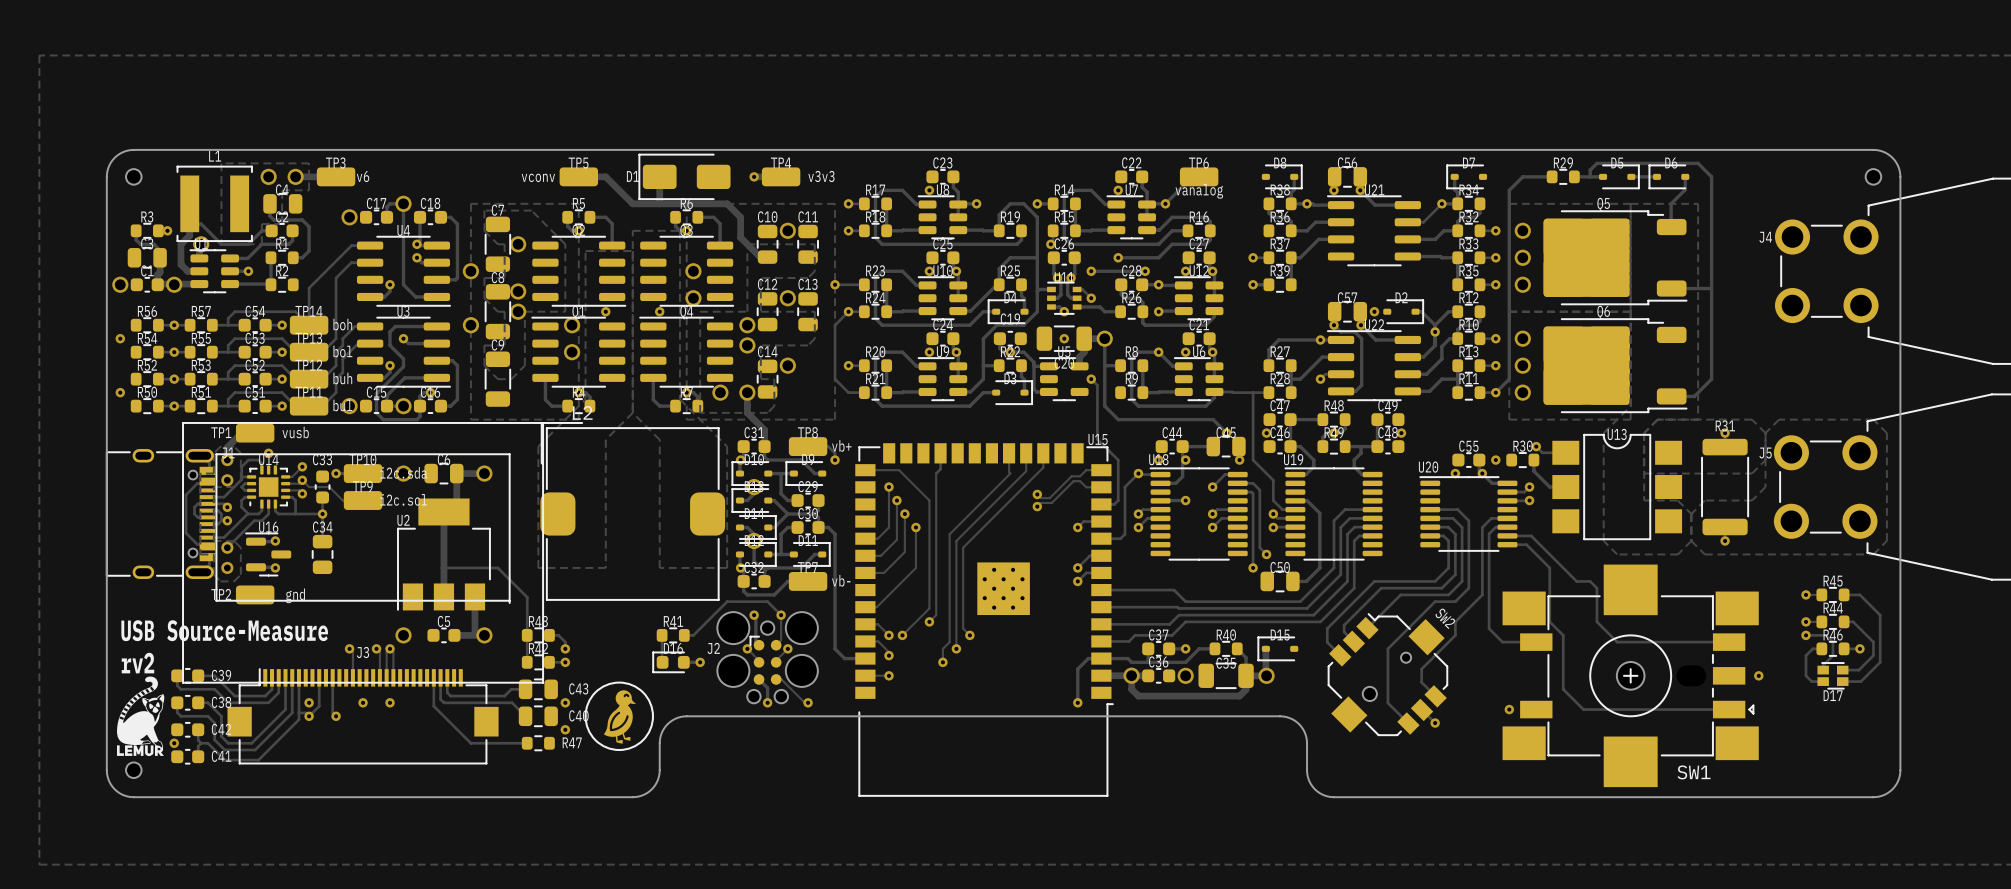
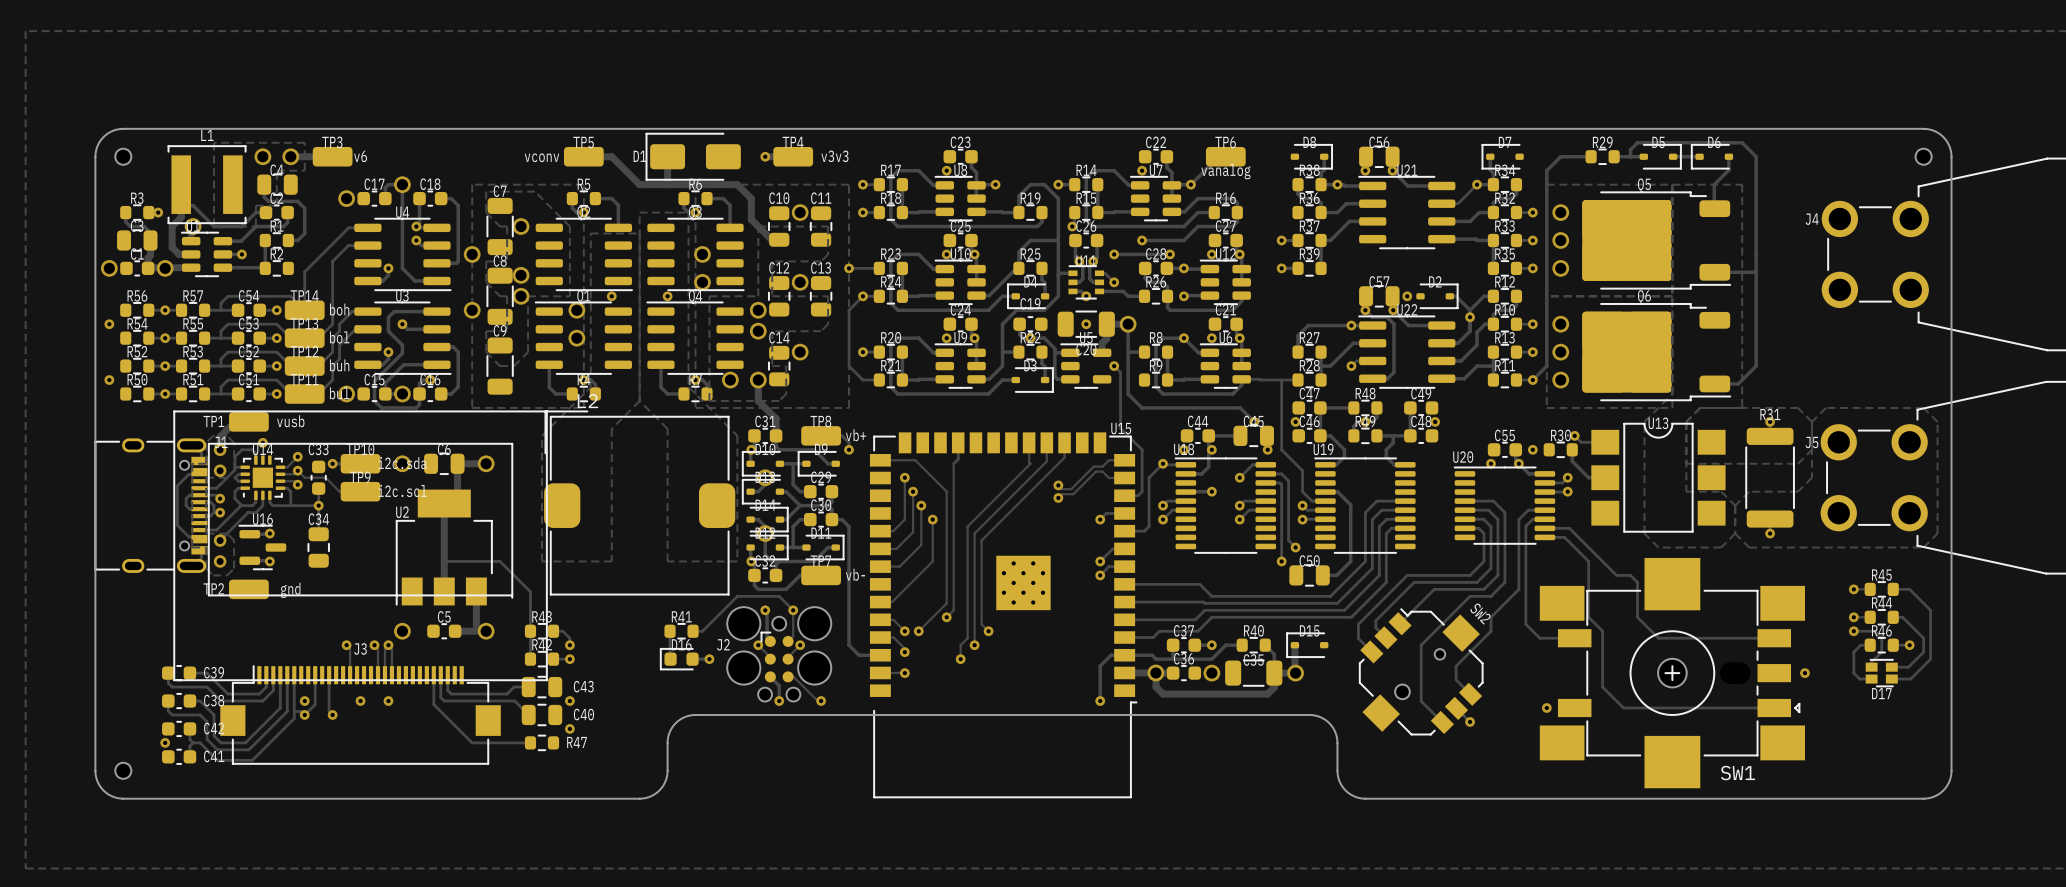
text: USB Source-Measure (224, 630) -> none
text: rv2 (137, 663) -> none
drawing: [117, 676, 165, 757] -> none
part: (619, 716) -> none

